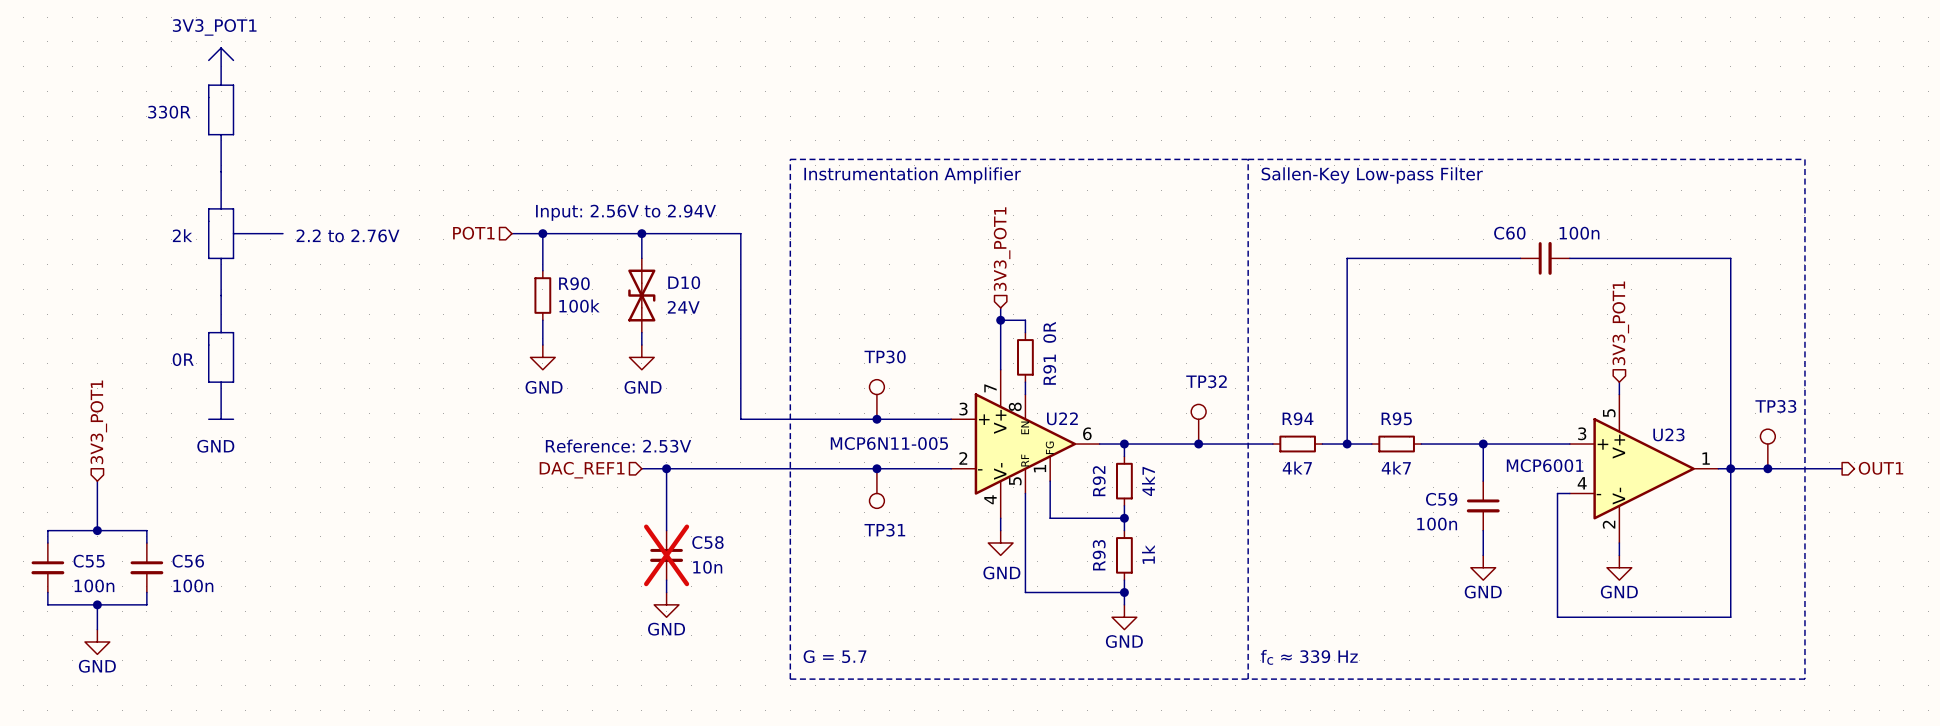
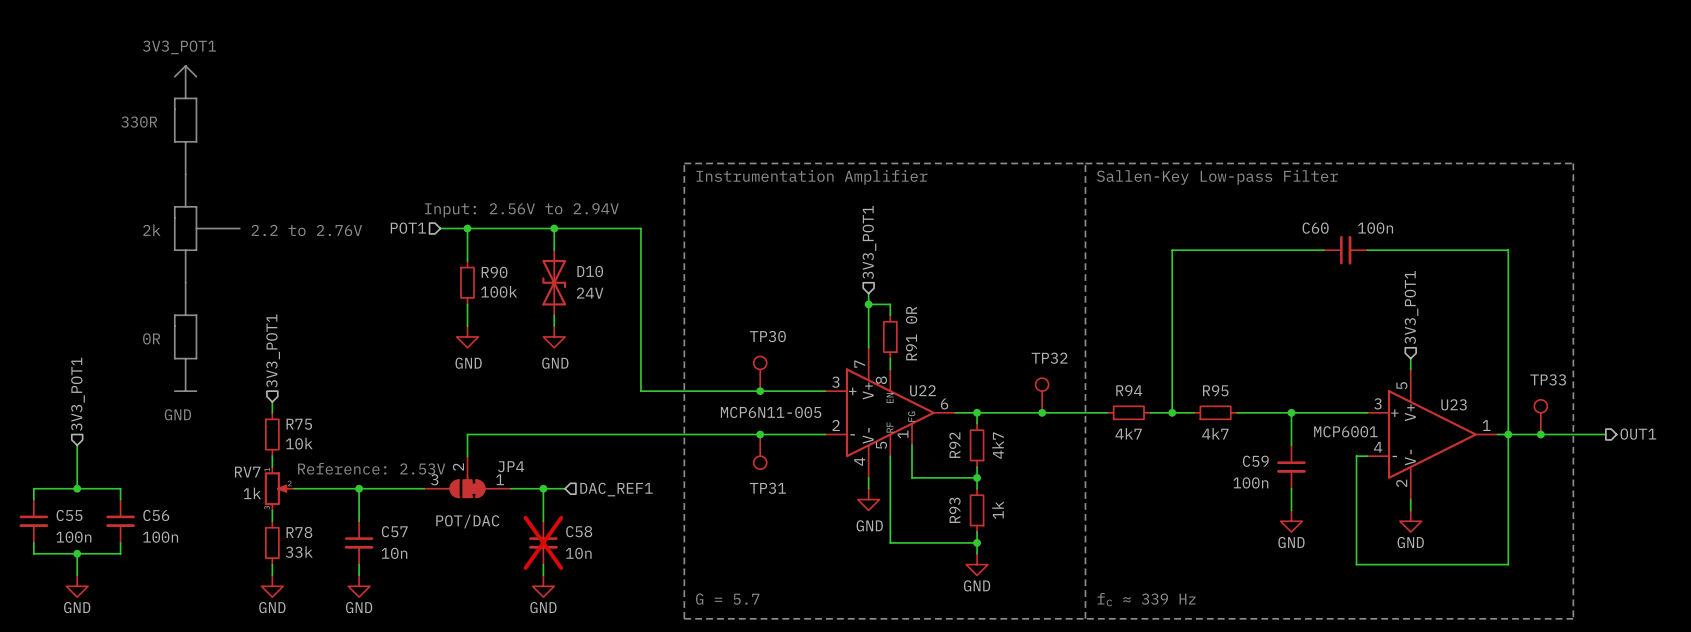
hierarchical label: none -> 3V3_POT1 (273, 350)
wire: none -> (272, 401) (272, 412)
text position: Reference: 2.53V (618, 446) -> Reference: 2.53V (371, 468)
R75: none -> 10k (272, 434)
wire: none -> (554, 434) (467, 434) (467, 456)
wire: (666, 468) (666, 530) -> none
junction: (666, 468) -> none
hierarchical label rotation: 0° (582, 470) -> 180° (616, 489)
hierarchical label position: DAC_REF1 (582, 470) -> DAC_REF1 (616, 489)
wire: none -> (272, 456) (272, 467)
JP4: none -> POT/DAC (467, 476)
RV7: none -> 1k (279, 488)
wire: none -> (294, 488) (424, 488)
wire: none -> (359, 488) (359, 521)
junction: none -> (359, 488)
wire: none -> (510, 488) (565, 488)
wire: none -> (543, 488) (543, 521)
junction: none -> (543, 488)
wire: none -> (272, 510) (272, 521)
C58 position: (666, 555) -> (543, 542)
wire: (666, 580) (666, 592) -> (543, 564) (543, 575)
R78: none -> 33k (272, 542)
C57: none -> 10n (359, 542)
power symbol position: GND (666, 604) -> GND (543, 586)
wire: none -> (272, 564) (272, 575)
wire: none -> (359, 564) (359, 575)
power symbol: none -> GND (272, 586)
power symbol: none -> GND (359, 586)

